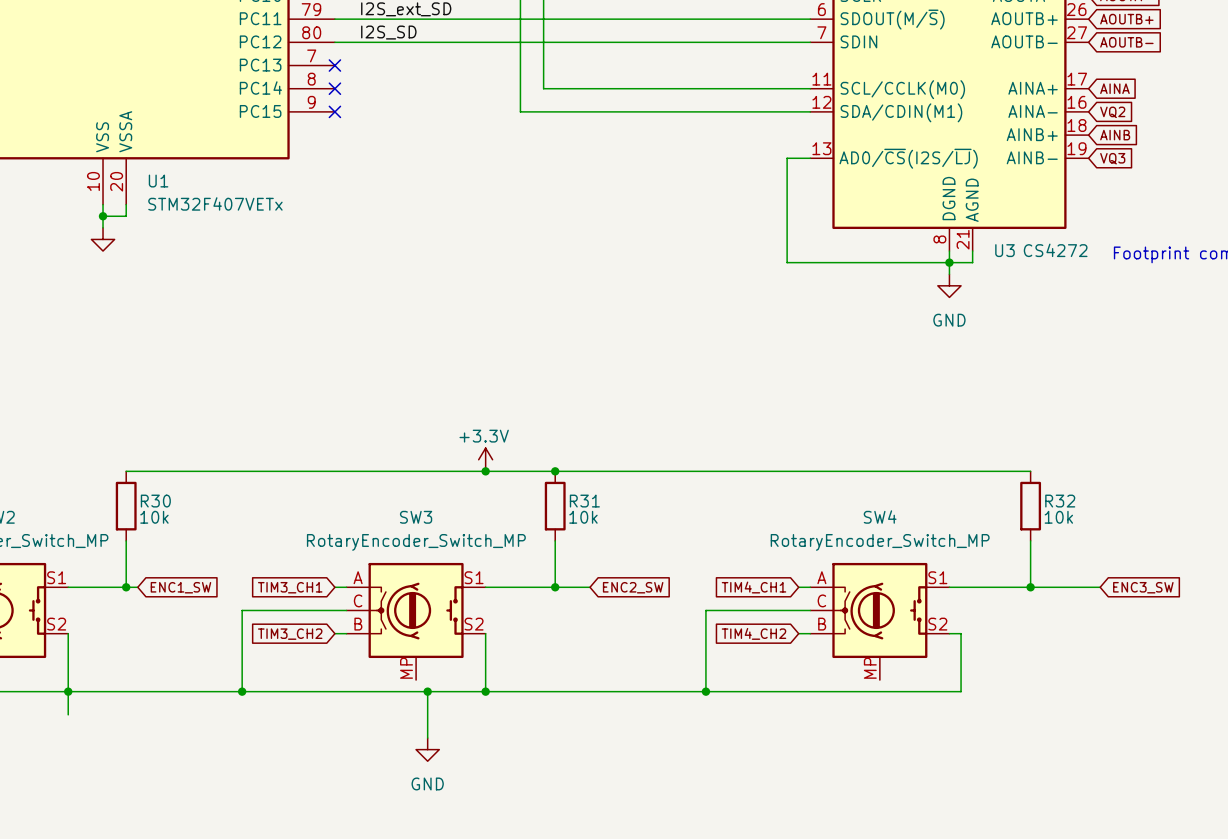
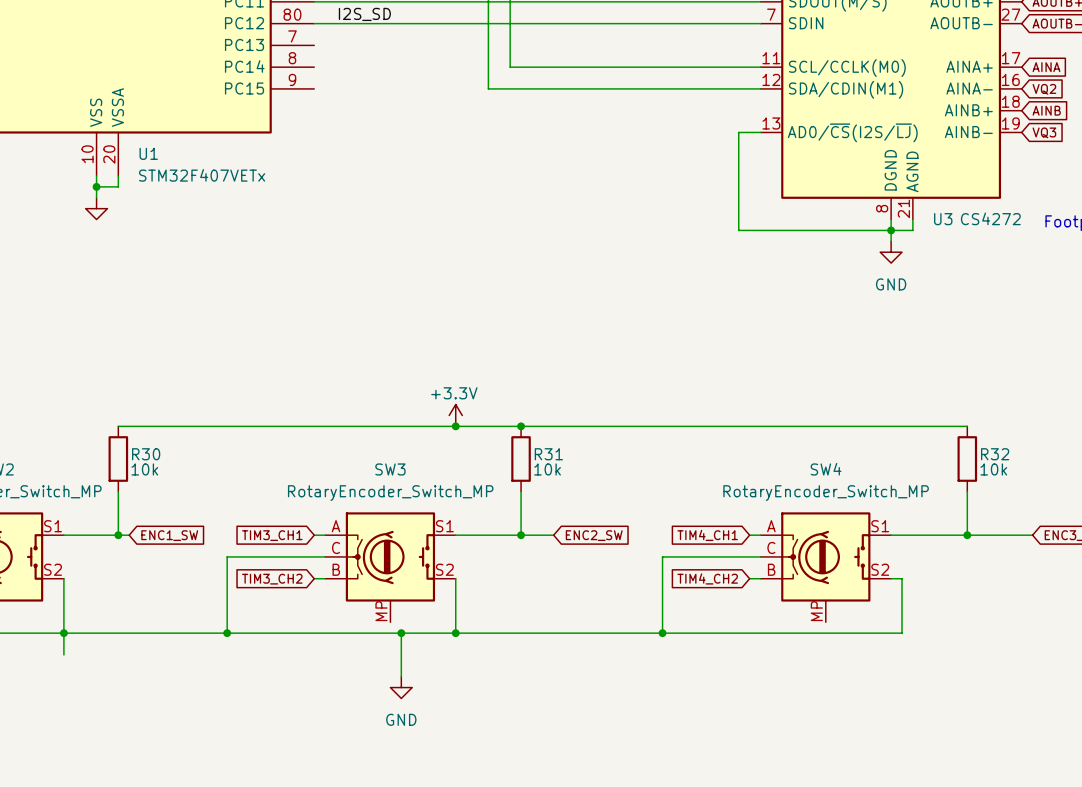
no-connect mark: (334, 65) -> none
no-connect mark: (334, 88) -> none
no-connect mark: (334, 111) -> none

